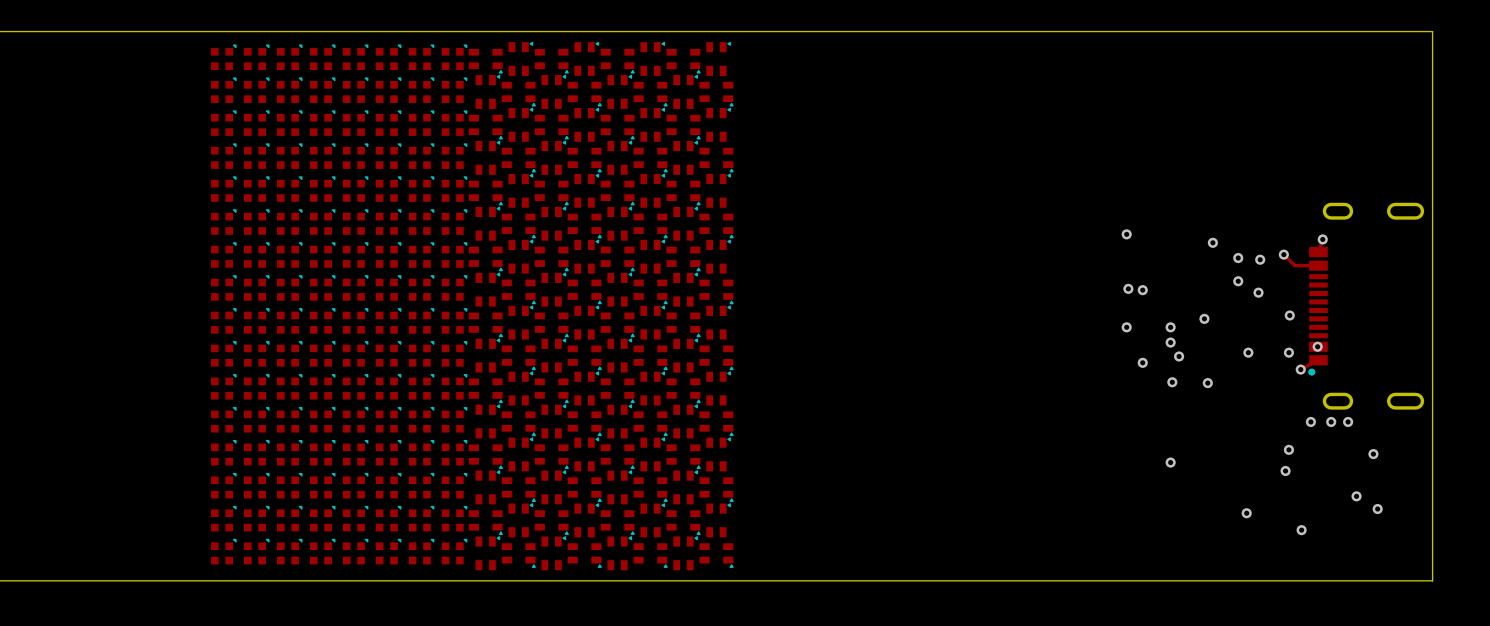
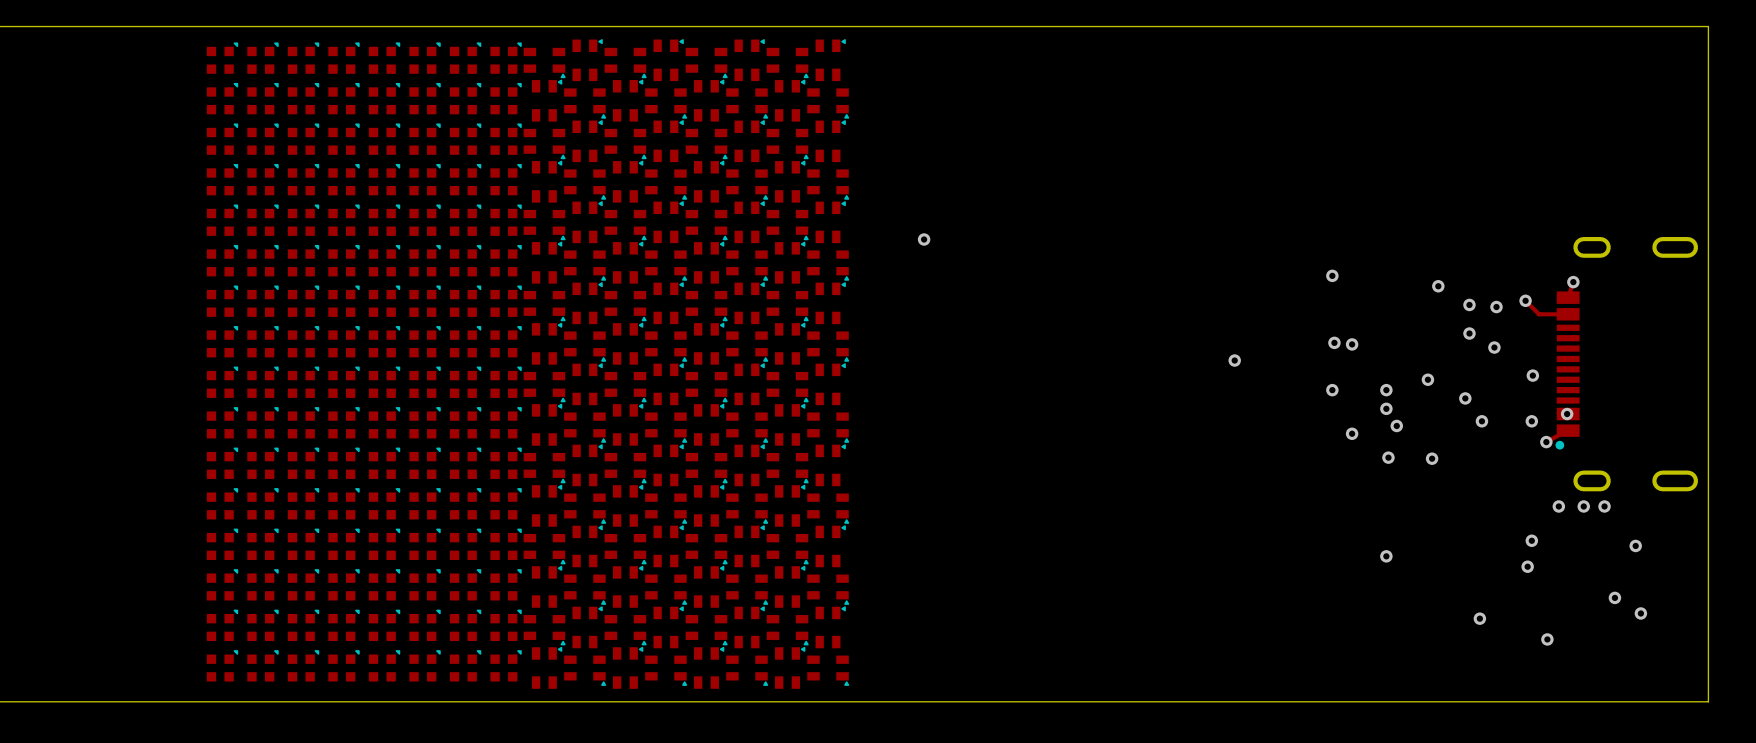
via: none -> (924, 239)
via: none -> (1234, 360)
via: none -> (1465, 398)

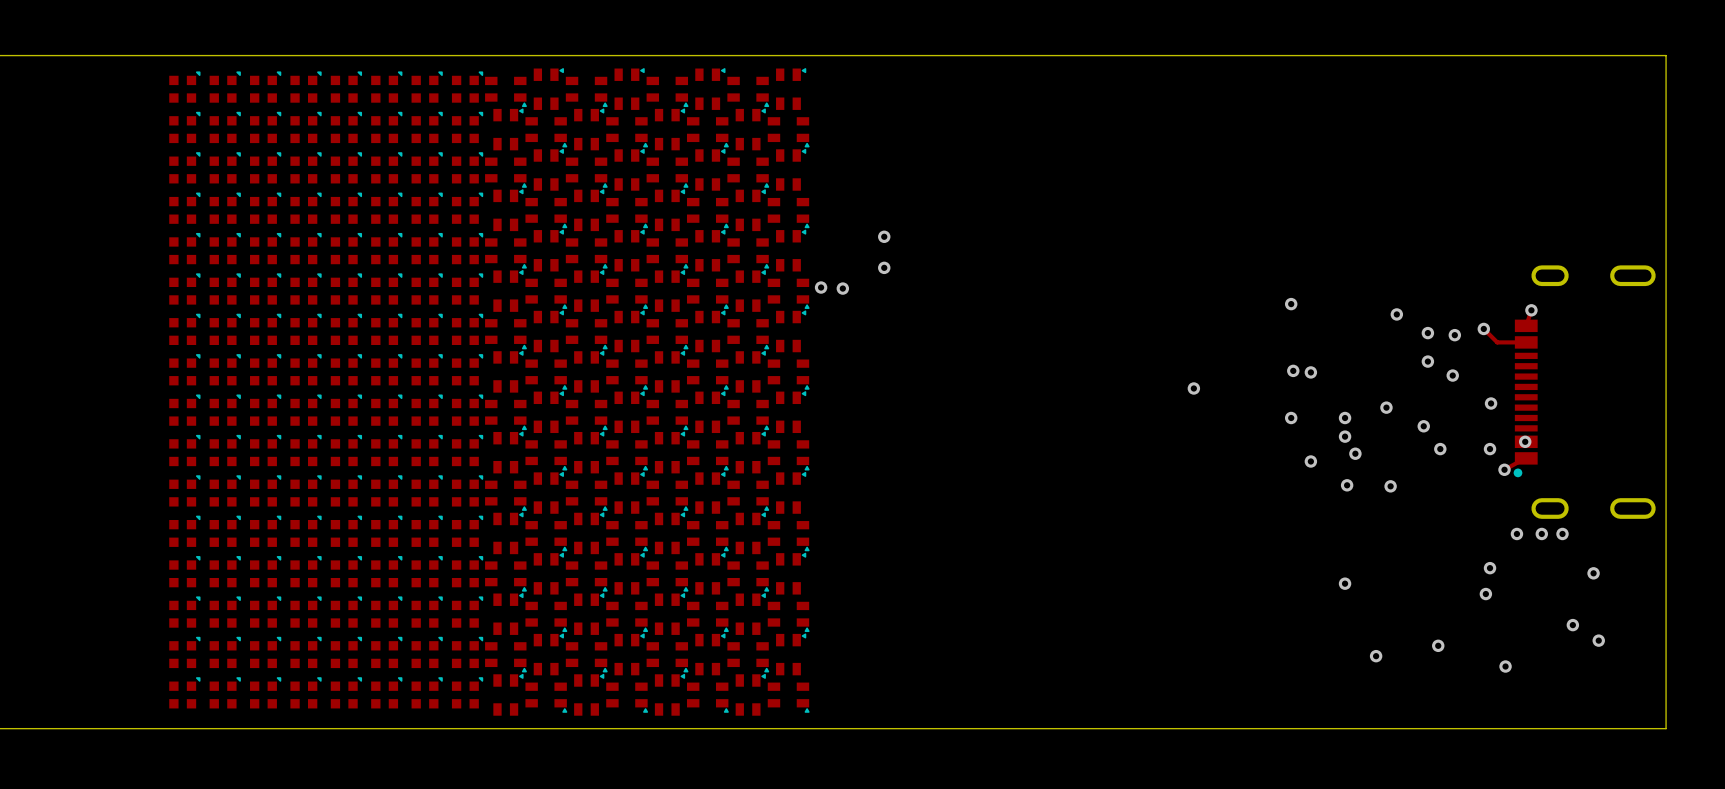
via: none -> (884, 236)
via: none -> (821, 287)
via: none -> (842, 288)
via: none -> (1376, 656)

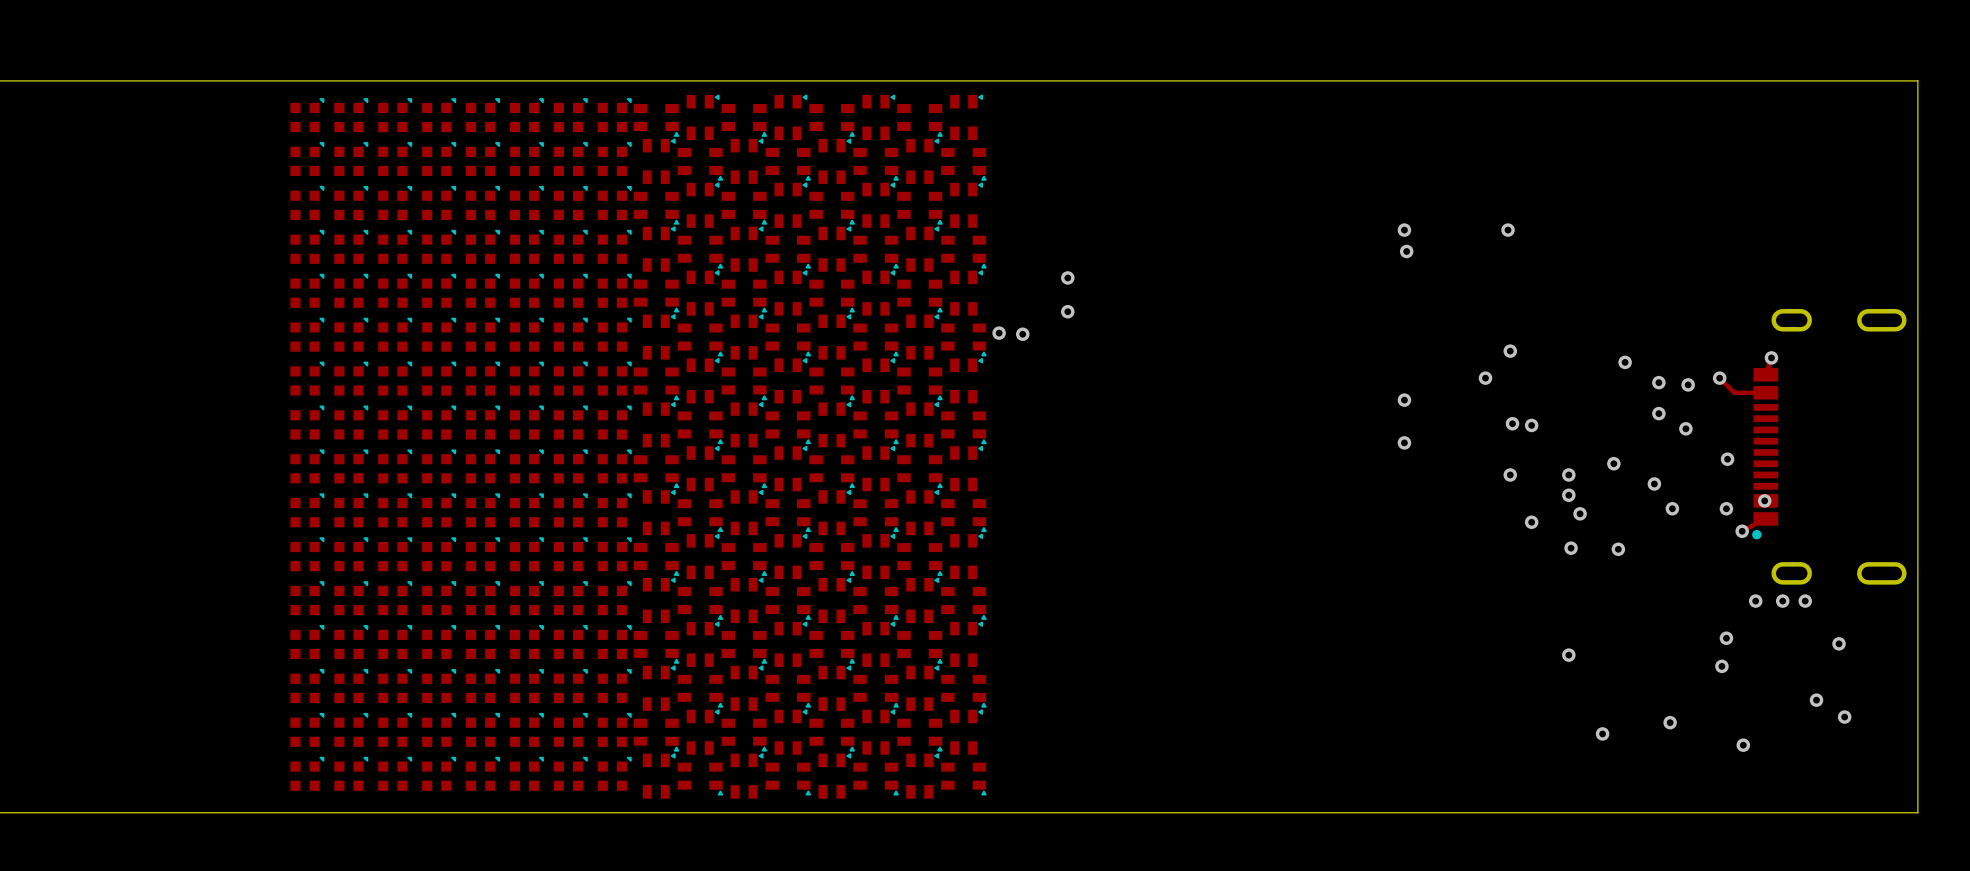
via: none -> (1404, 230)
via: none -> (1508, 230)
via: none -> (1406, 251)
via: none -> (1485, 378)
via: none -> (1404, 400)

